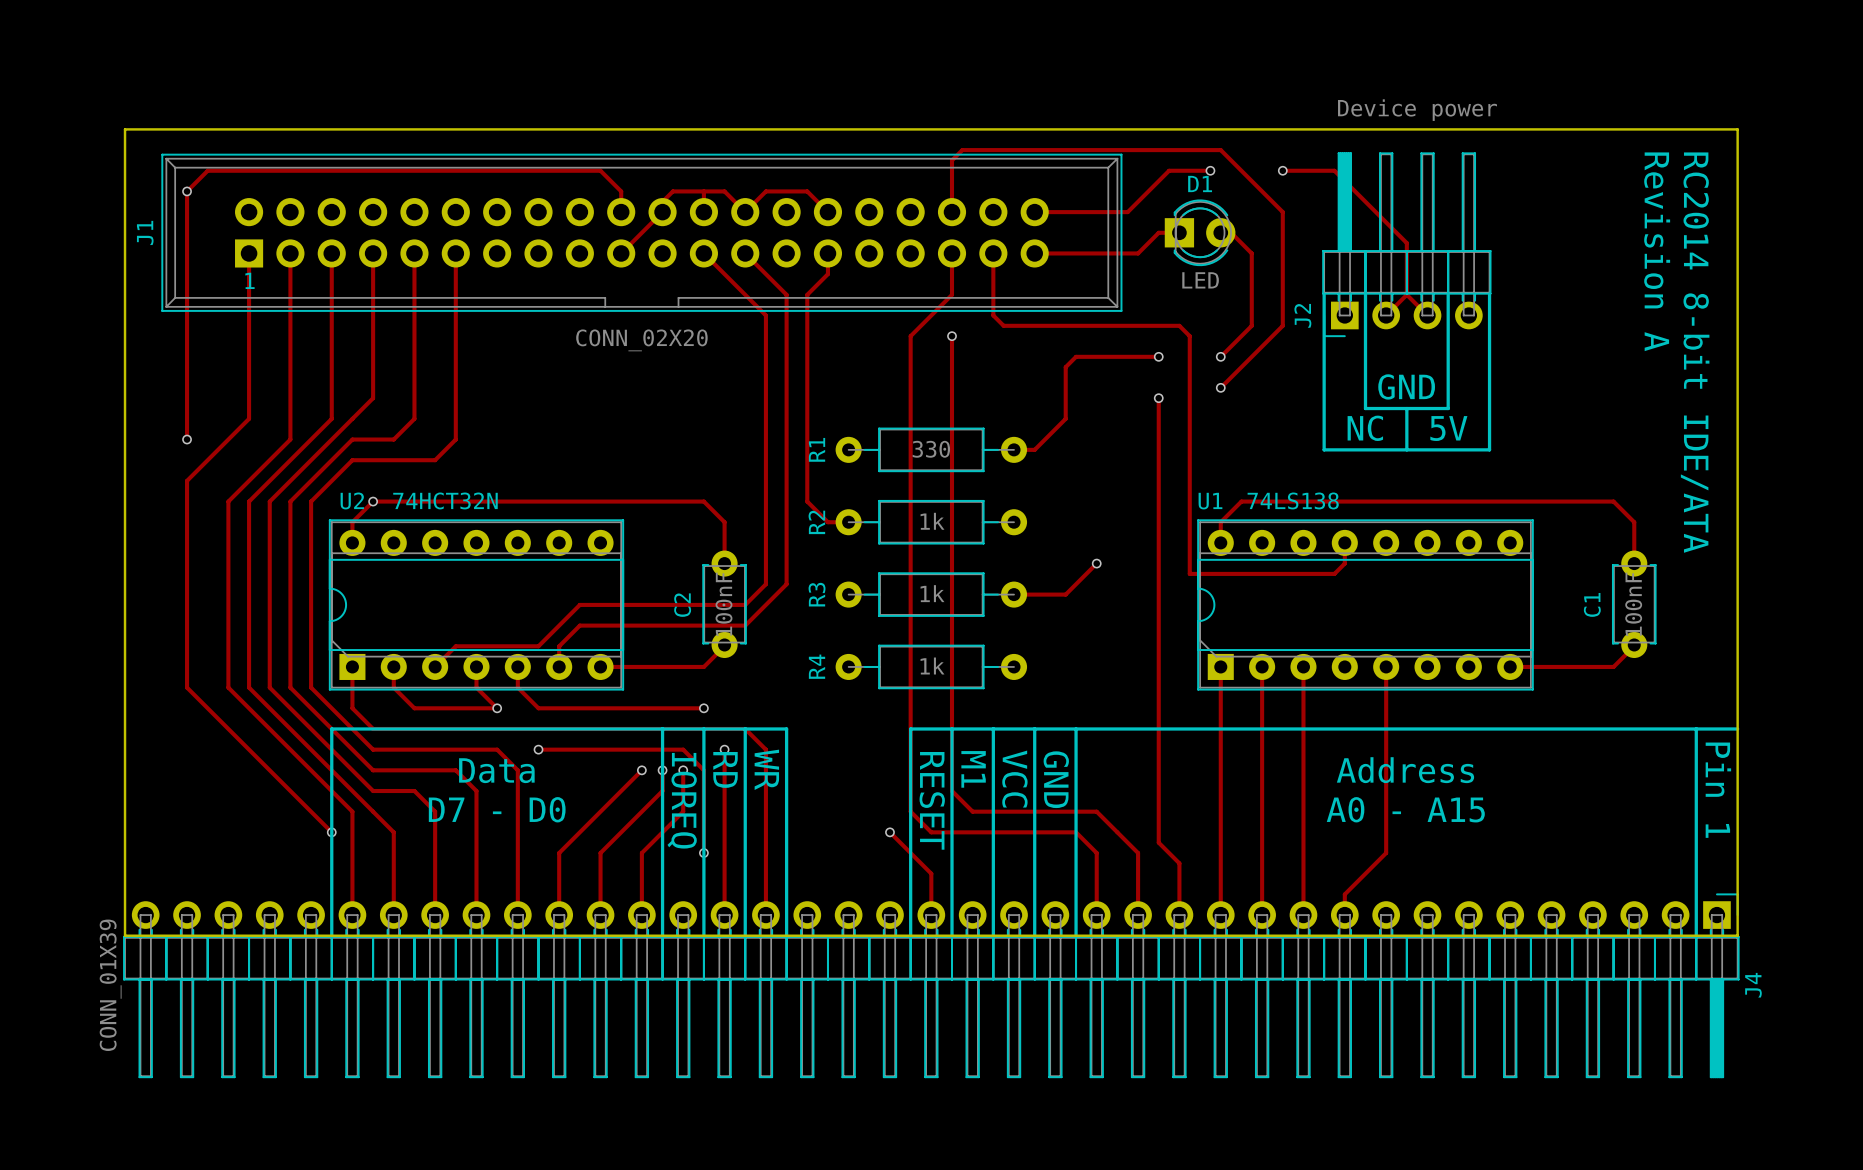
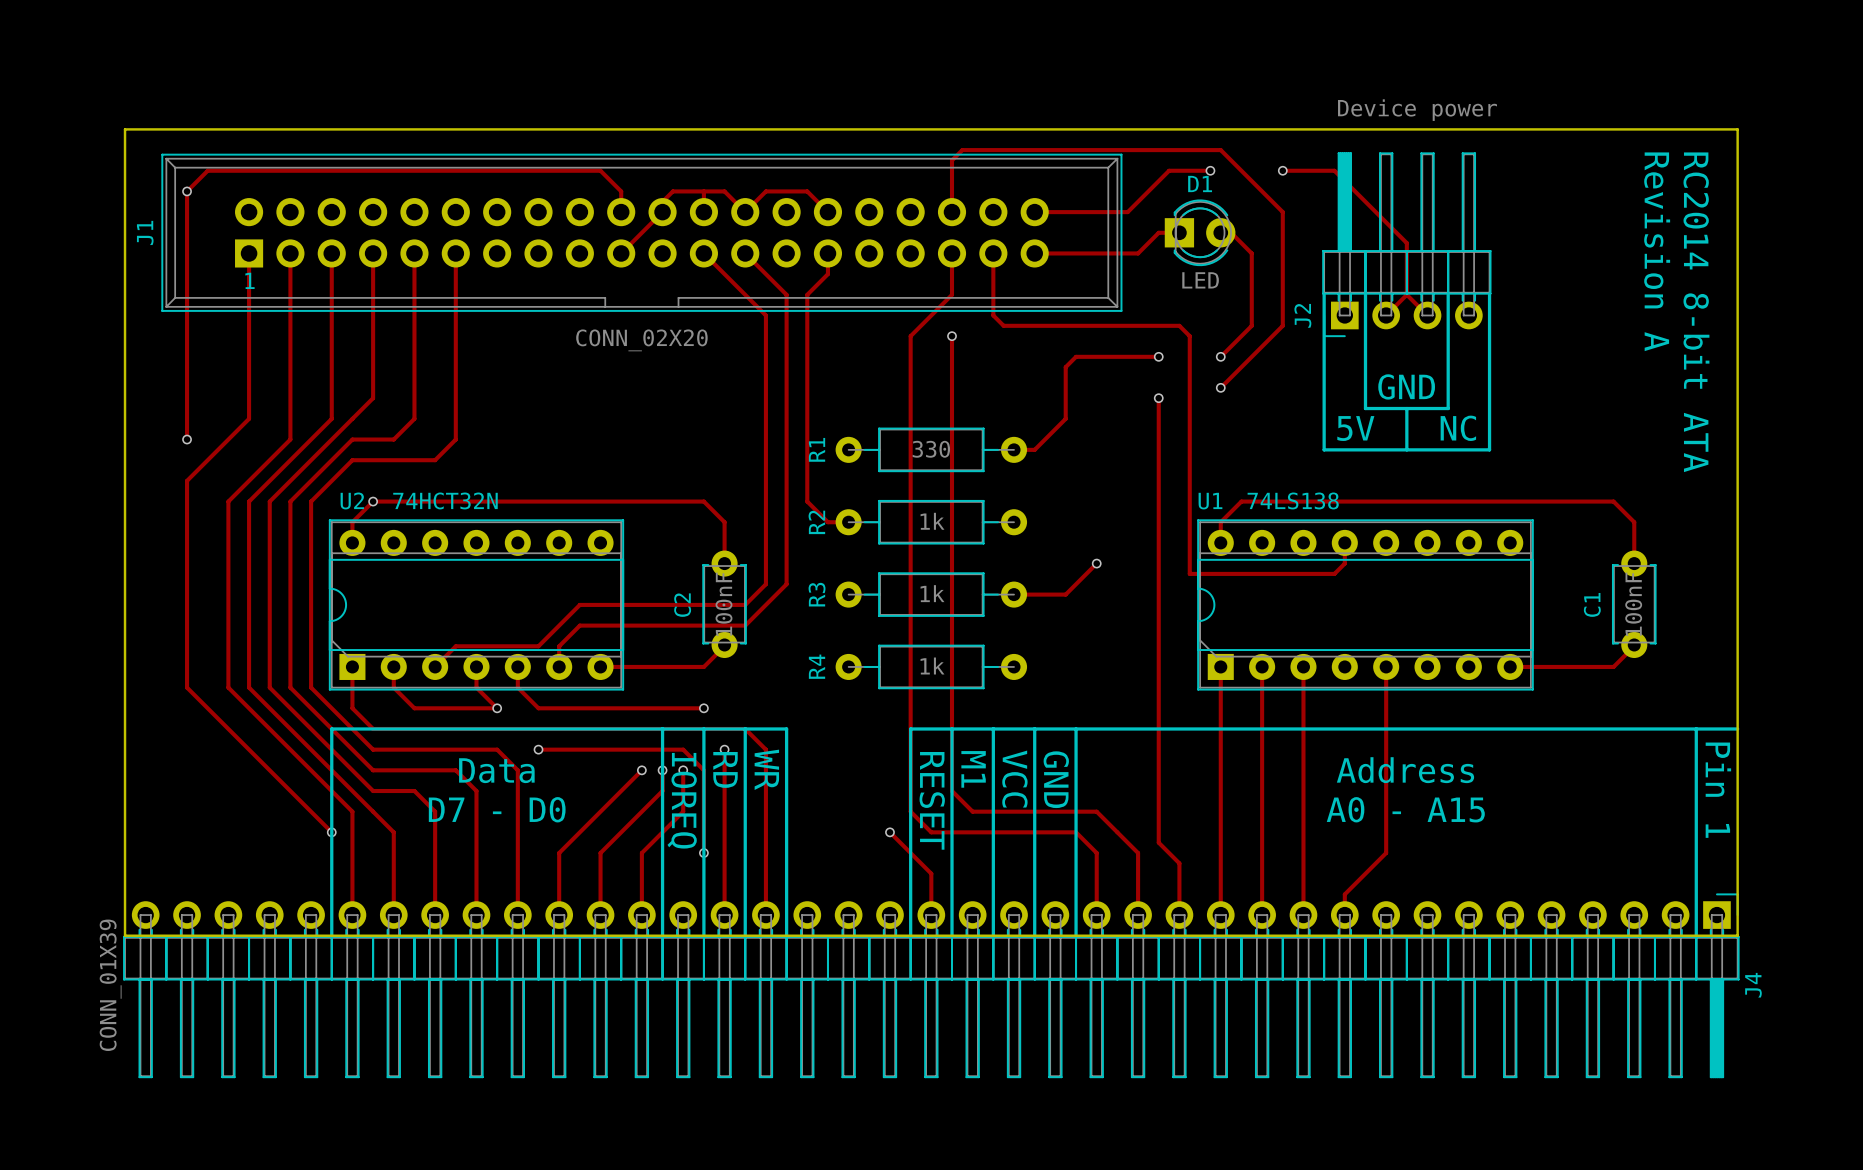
text: RC2014 8-bit IDE/ATA (1695, 352) -> RC2014 8-bit ATA (1696, 312)
text: NC (1365, 428) -> 5V (1355, 428)
text: 5V (1448, 428) -> NC (1458, 428)

